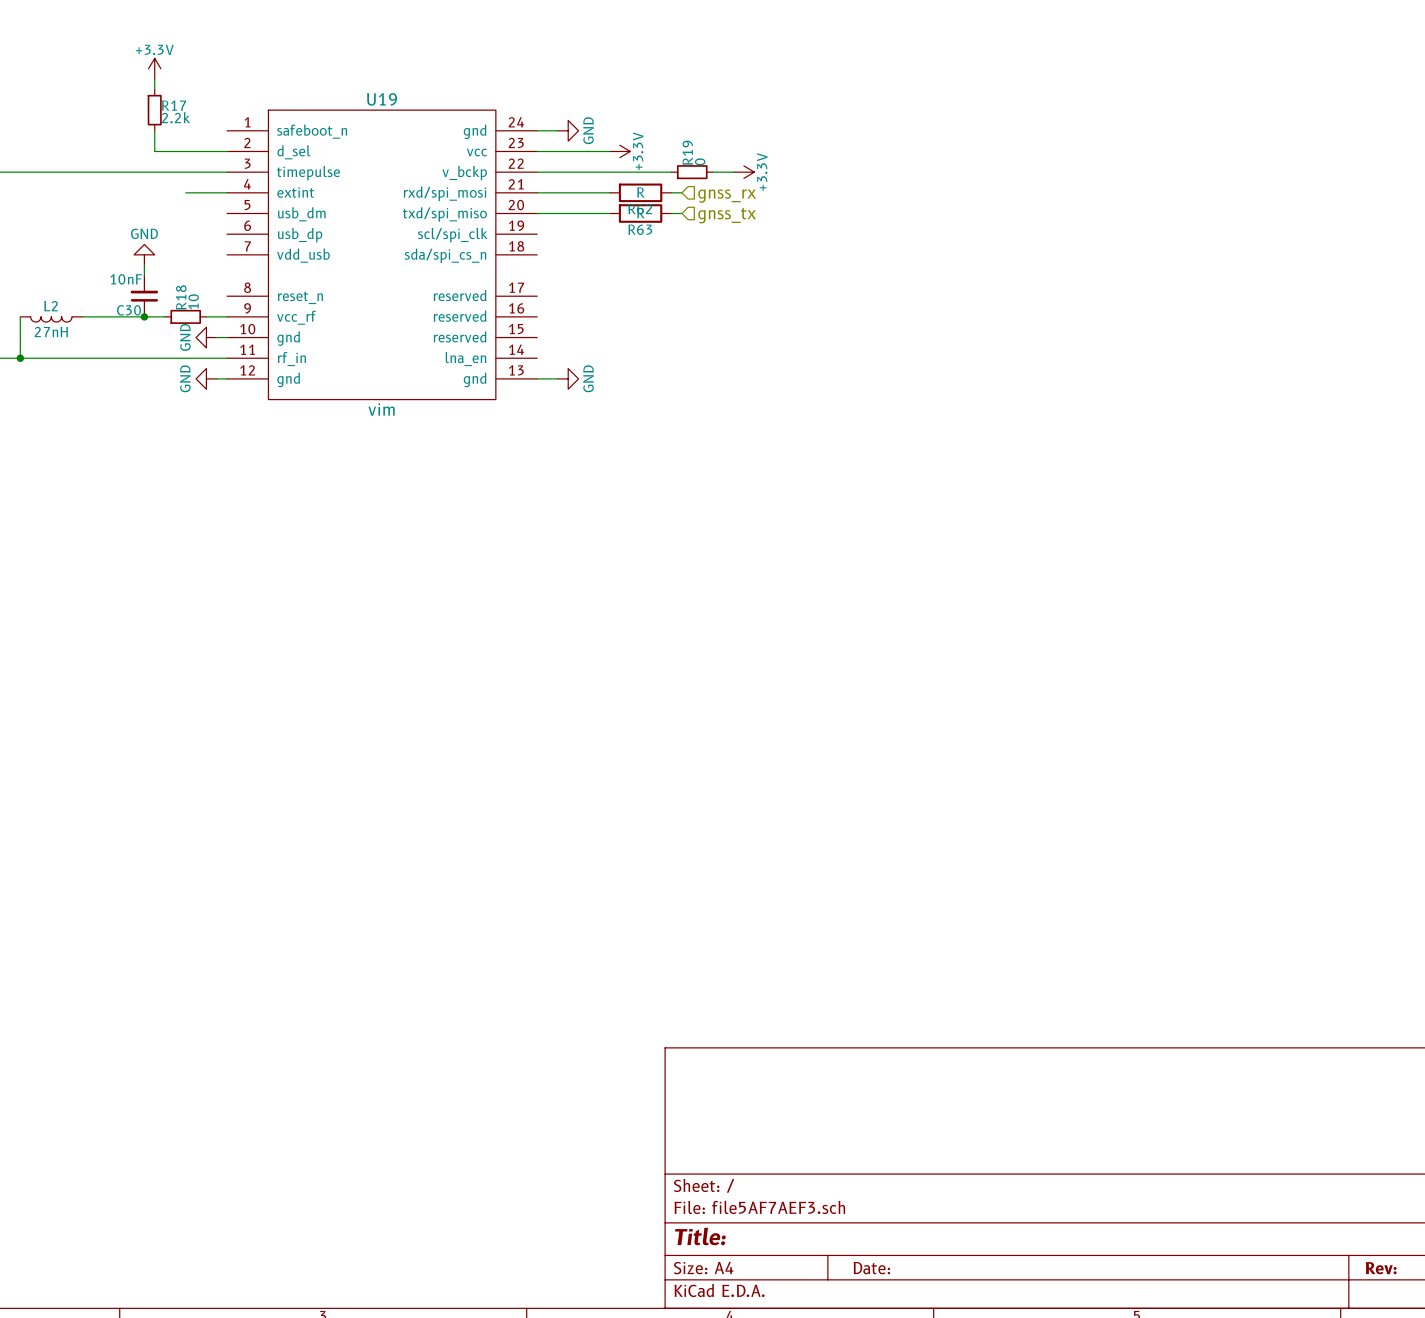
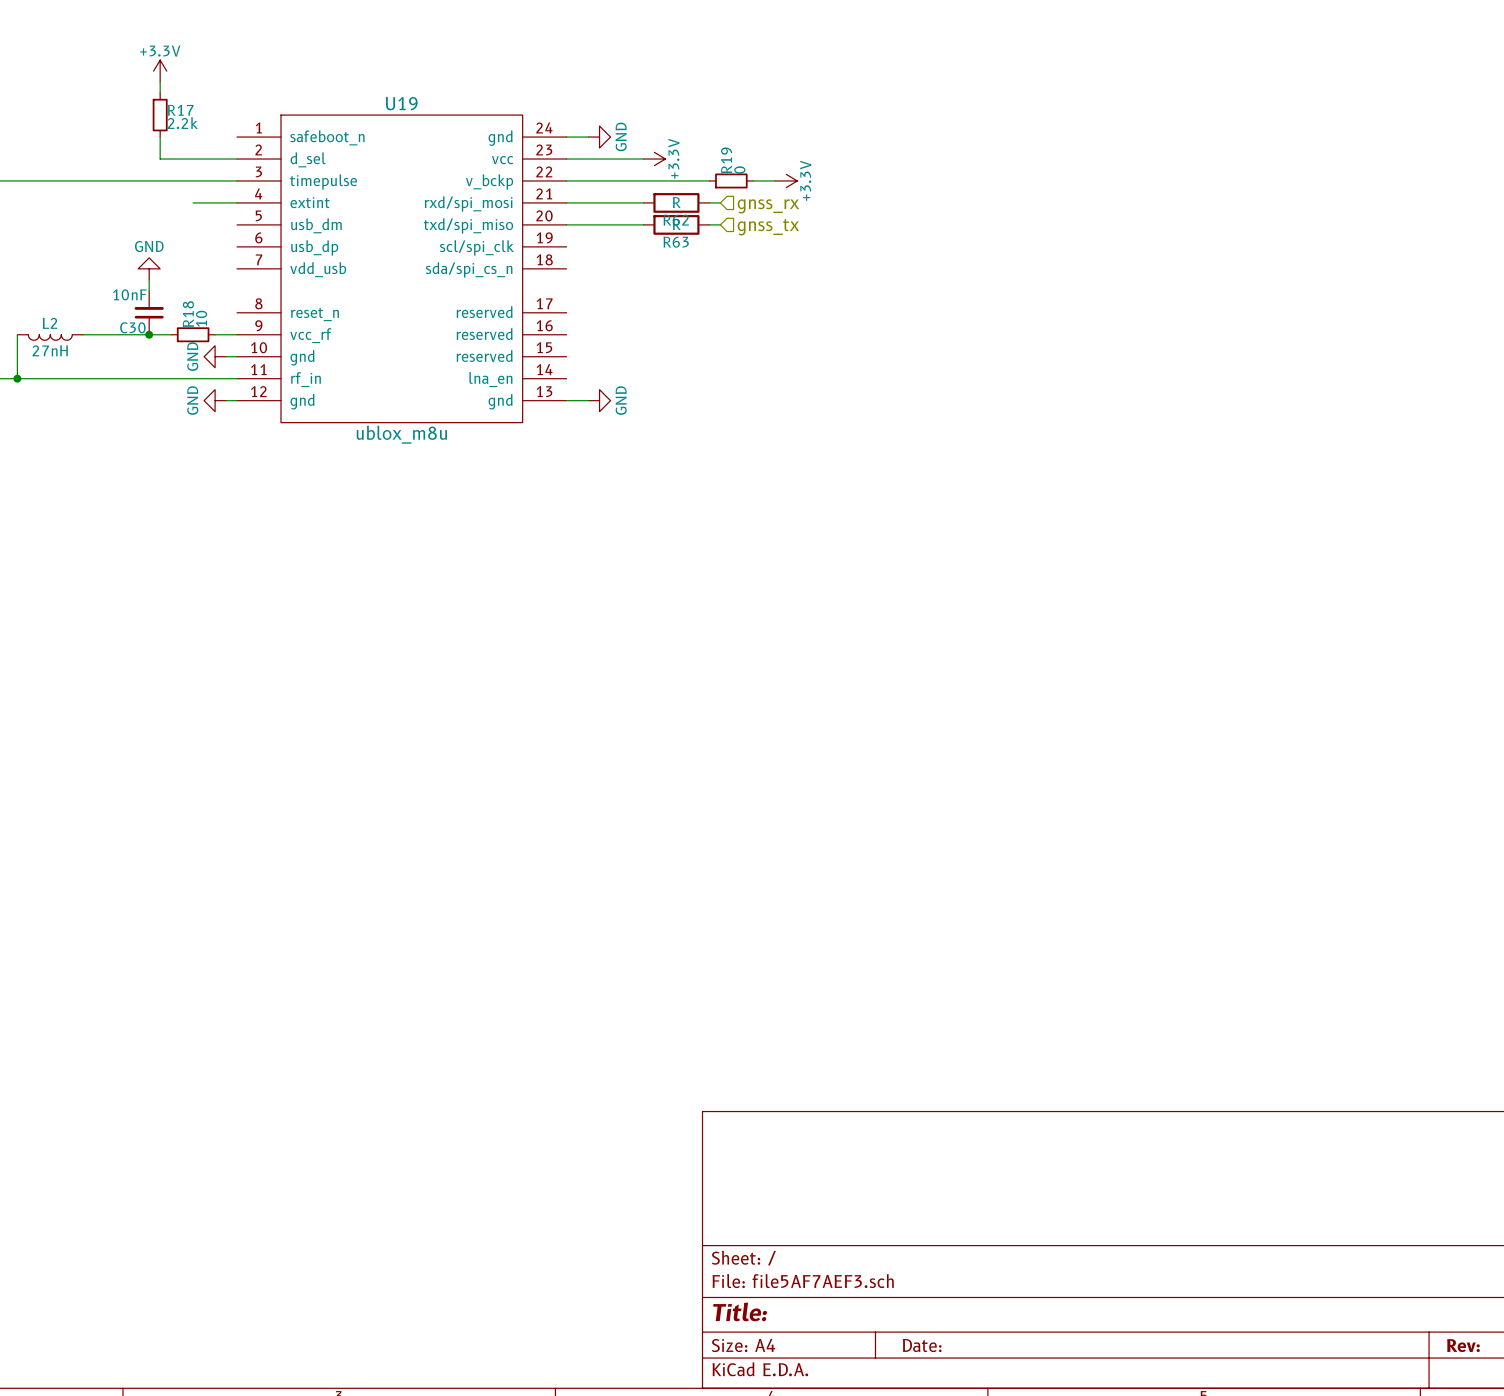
U19 value: vim (381, 409) -> ublox_m8u (401, 434)

